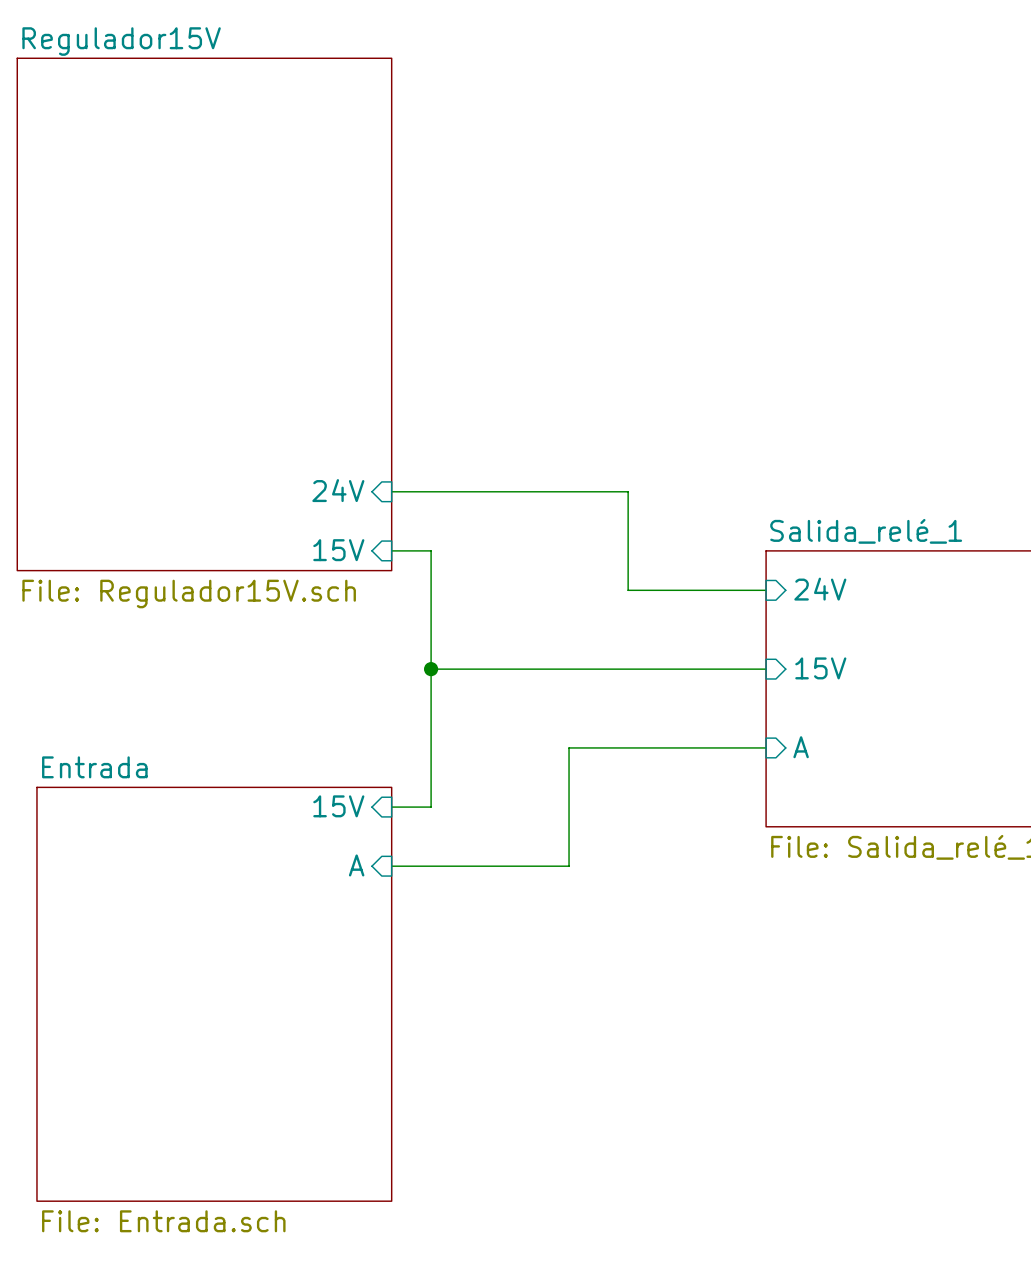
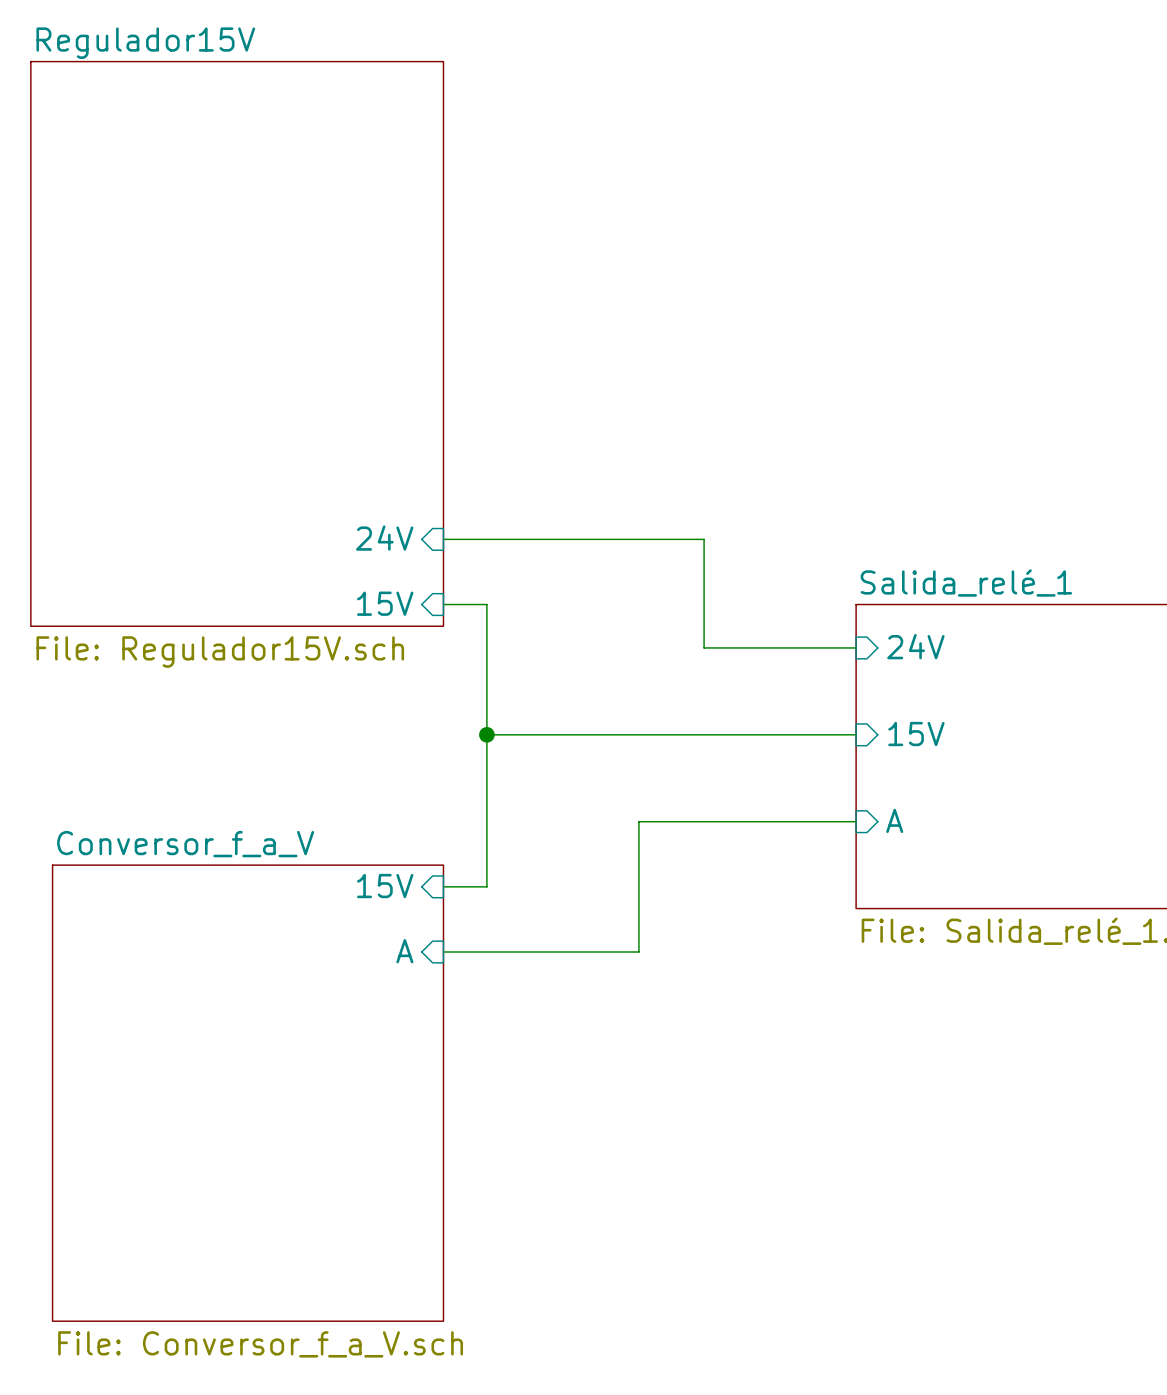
sheet Entrada name: Entrada (94, 767) -> Conversor_f_a_V (185, 844)
sheet Entrada value: File: Entrada.sch (163, 1221) -> File: Conversor_f_a_V.sch (260, 1344)

